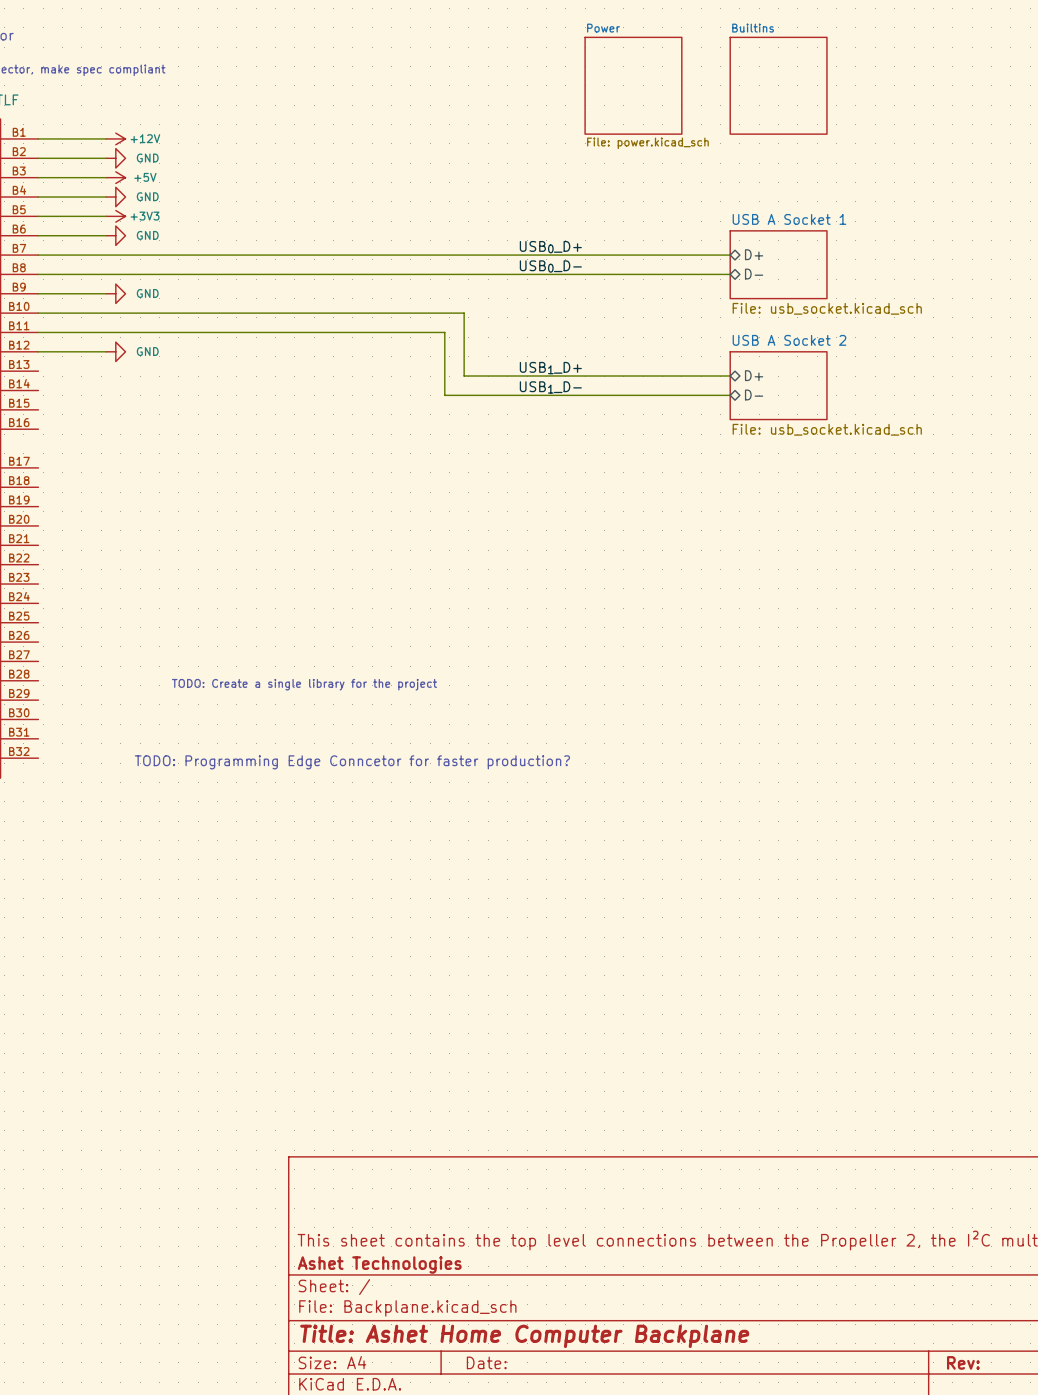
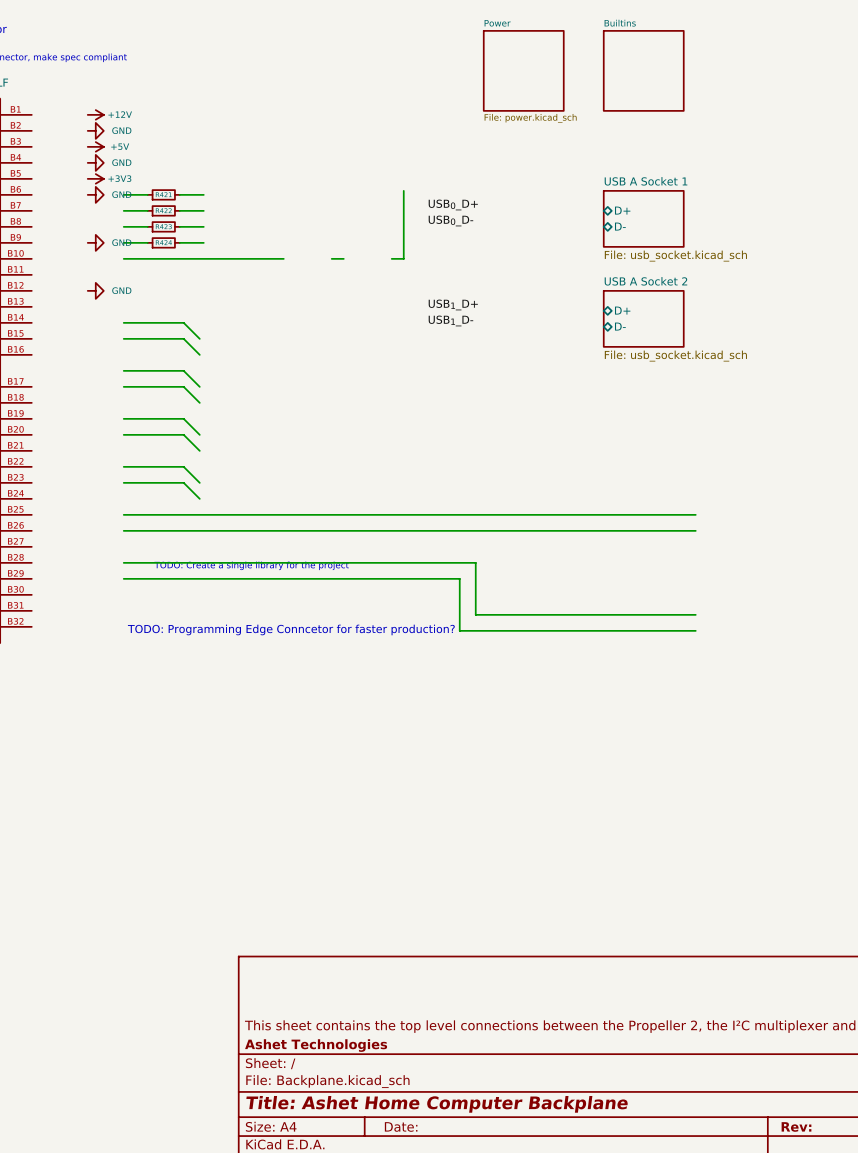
wire: (38, 138) (106, 138) -> none
wire: (38, 158) (106, 158) -> none
wire: (38, 177) (106, 177) -> none
wire: (38, 197) (106, 197) -> none
wire: (38, 216) (106, 216) -> none
wire: none -> (403, 190) (403, 258) (391, 258)
wire: (38, 235) (106, 235) -> none
wire: none -> (123, 194) (147, 194)
part: none -> (163, 194)
wire: none -> (179, 194) (203, 194)
wire: (38, 255) (149, 255) -> none
part: none -> (163, 210)
wire: (246, 255) (730, 255) -> none
wire: (38, 274) (149, 274) -> none
part: none -> (163, 226)
wire: (246, 274) (730, 274) -> none
wire: (38, 293) (106, 293) -> none
wire: none -> (123, 242) (147, 242)
part: none -> (163, 242)
wire: none -> (179, 242) (203, 242)
wire: (38, 313) (149, 313) -> none
wire: (343, 313) (401, 313) -> none
wire: (415, 313) (464, 313) (464, 376) (730, 376) -> none
wire: (38, 332) (444, 332) (444, 395) (730, 395) -> none
wire: (38, 351) (106, 351) -> none
wire: none -> (123, 322) (183, 322) (199, 338)
wire: none -> (123, 338) (183, 338) (199, 354)
wire: none -> (123, 370) (183, 370) (199, 386)
wire: none -> (123, 386) (183, 386) (199, 402)
wire: none -> (123, 418) (183, 418) (199, 434)
wire: none -> (123, 434) (183, 434) (199, 450)
wire: none -> (123, 466) (183, 466) (199, 482)
wire: none -> (123, 482) (183, 482) (199, 498)
wire: none -> (123, 514) (695, 514)
wire: none -> (123, 530) (695, 530)
wire: none -> (123, 562) (475, 562) (475, 614) (695, 614)
wire: none -> (123, 578) (459, 578) (459, 630) (695, 630)

